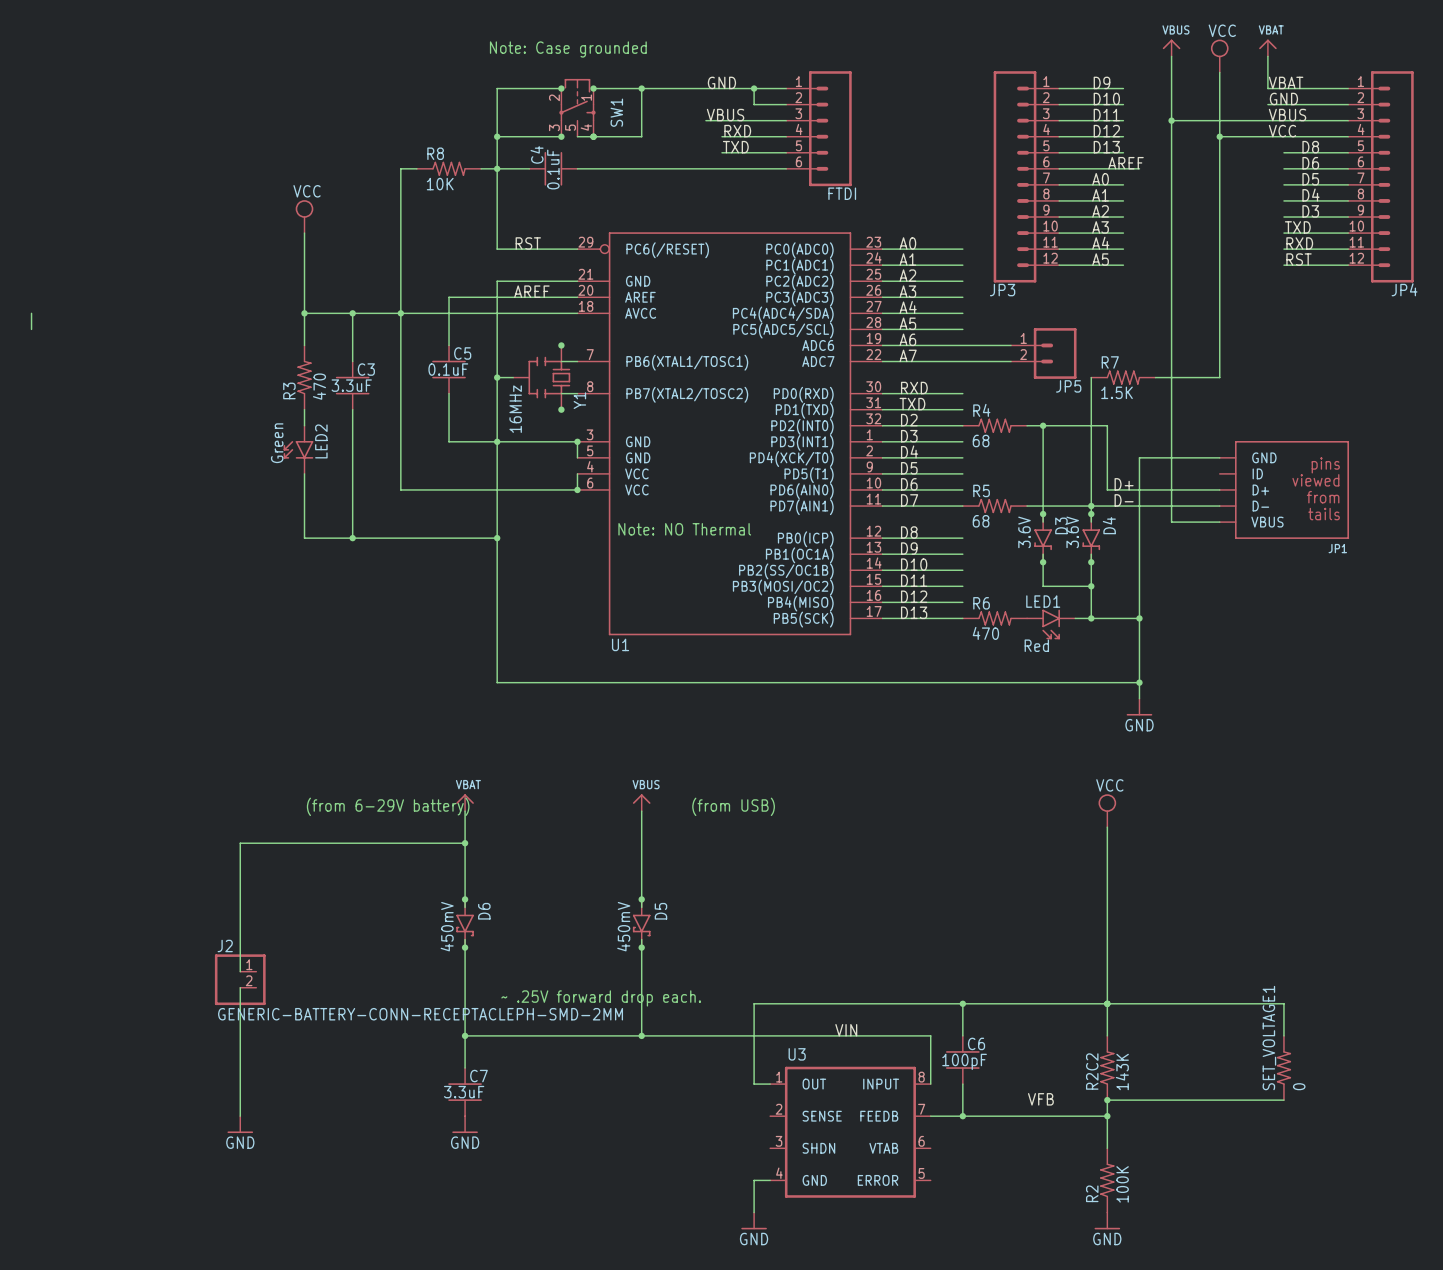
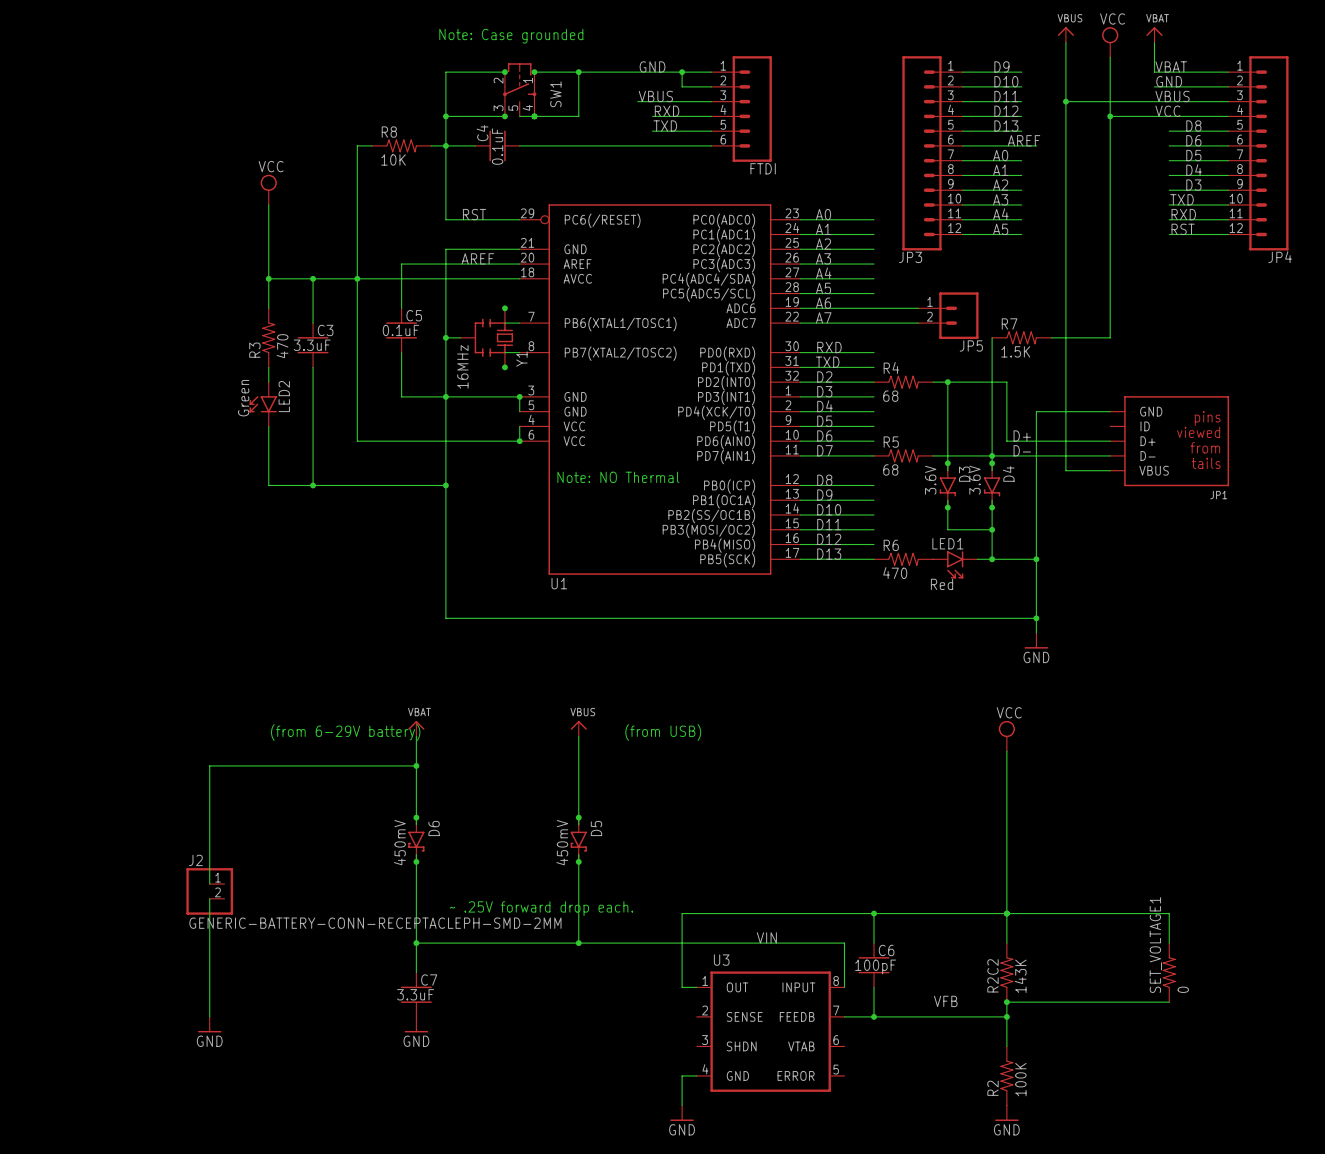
wire: (31, 313) (31, 329) -> none

